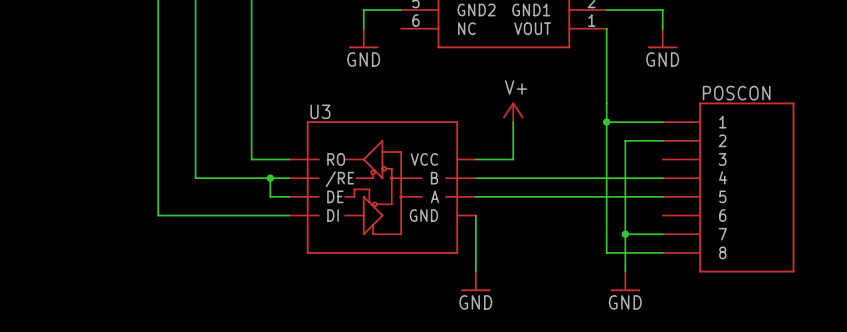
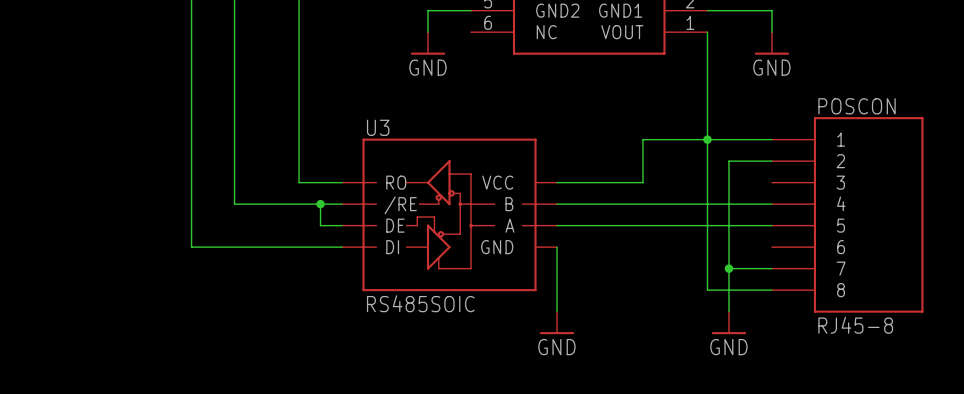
power symbol: V+ (513, 112) -> none
wire: (513, 122) (513, 159) -> (707, 139) (642, 139) (642, 182) (599, 182)
U3 value: none -> RS485SOIC (420, 303)
POSCON value: none -> RJ45-8 (855, 325)

